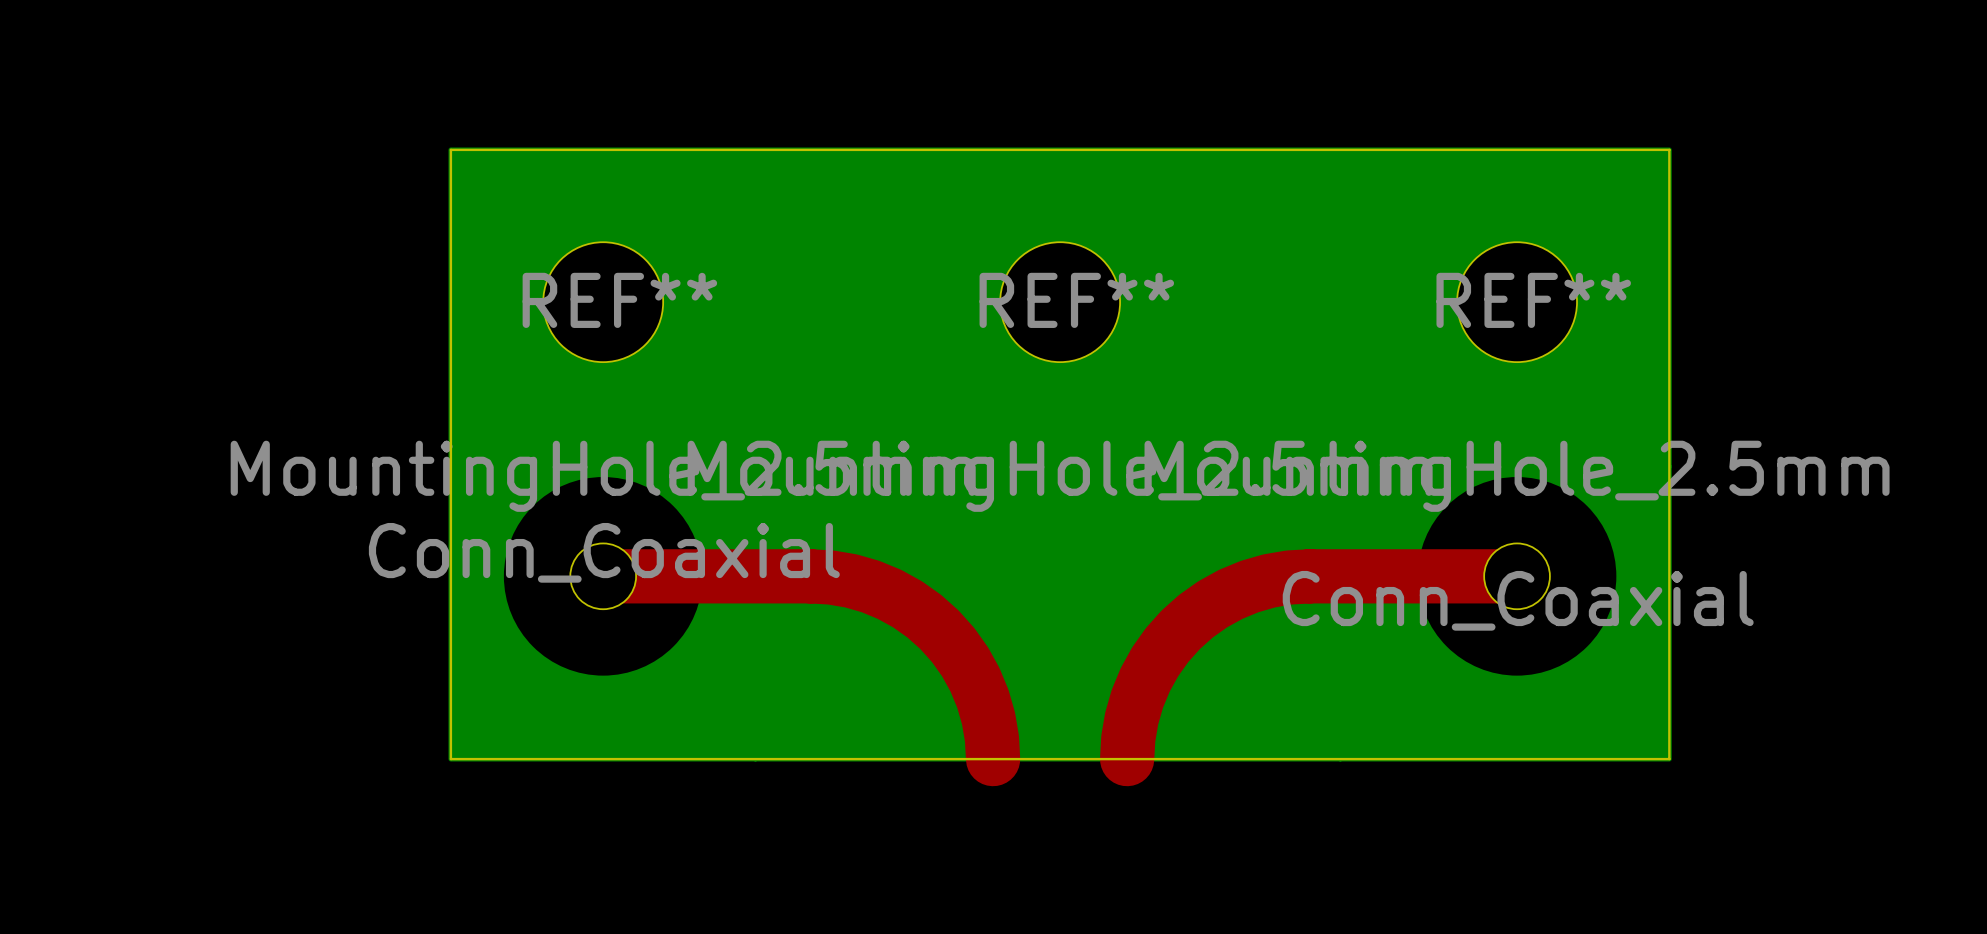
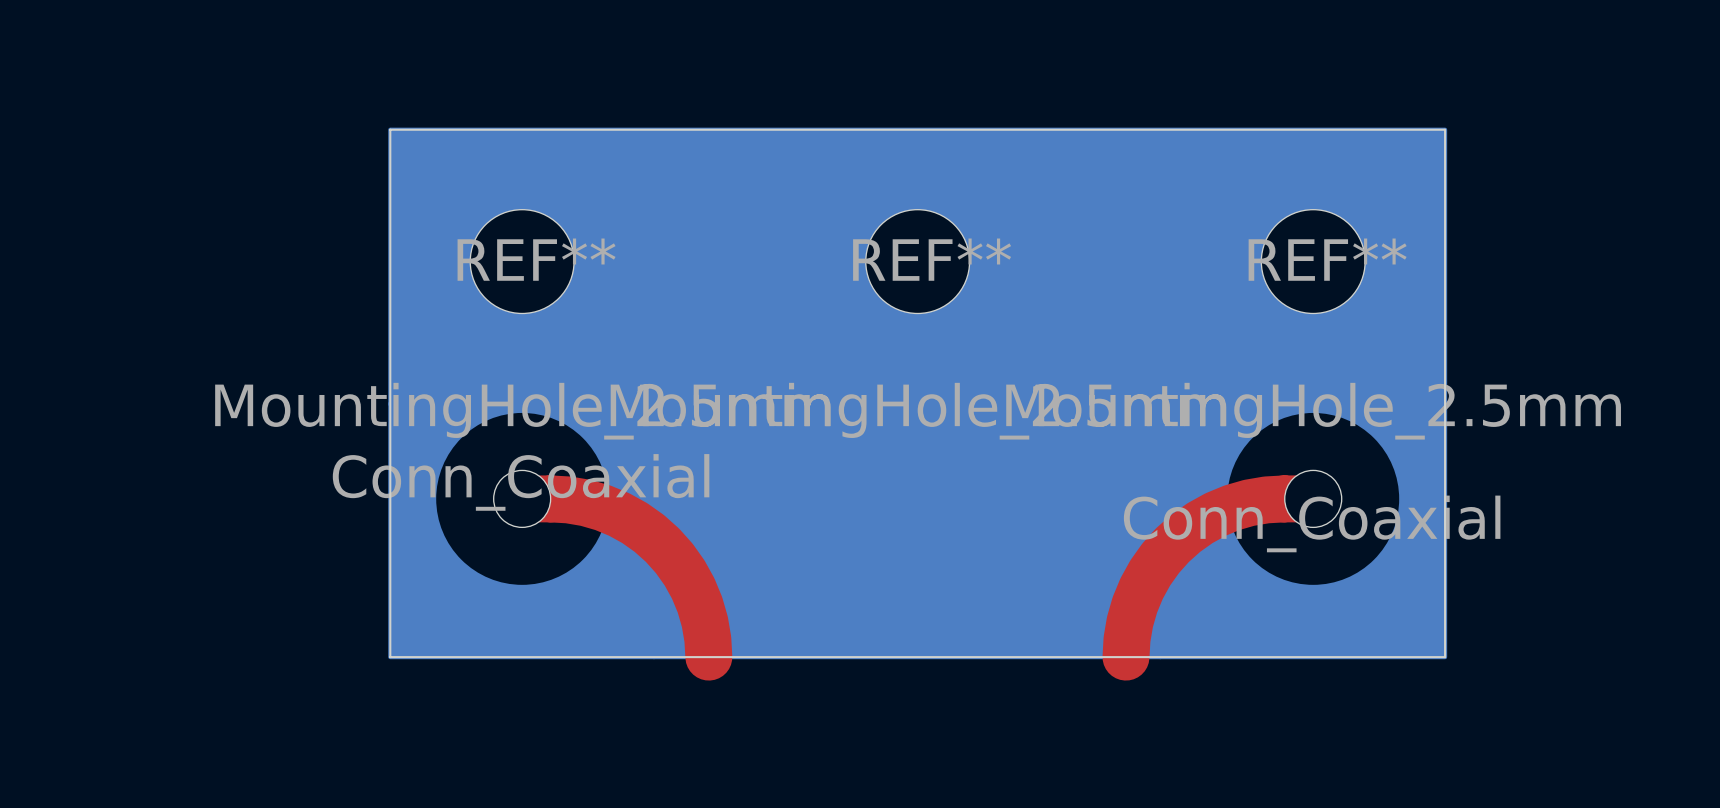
top track: (636, 576) (830, 577) (870, 586) (889, 594) (924, 616) (939, 629) (965, 661) (982, 698) (988, 718) (993, 759) -> (550, 498) (585, 502) (602, 507) (634, 523) (662, 545) (684, 572) (693, 588) (704, 621) (708, 657)
top track: (1483, 576) (1289, 577) (1269, 580) (1230, 594) (1195, 616) (1167, 645) (1155, 661) (1137, 698) (1128, 738) (1127, 759) -> (1284, 498) (1266, 499) (1231, 507) (1200, 523) (1172, 545) (1150, 572) (1141, 588) (1129, 621) (1126, 657)

